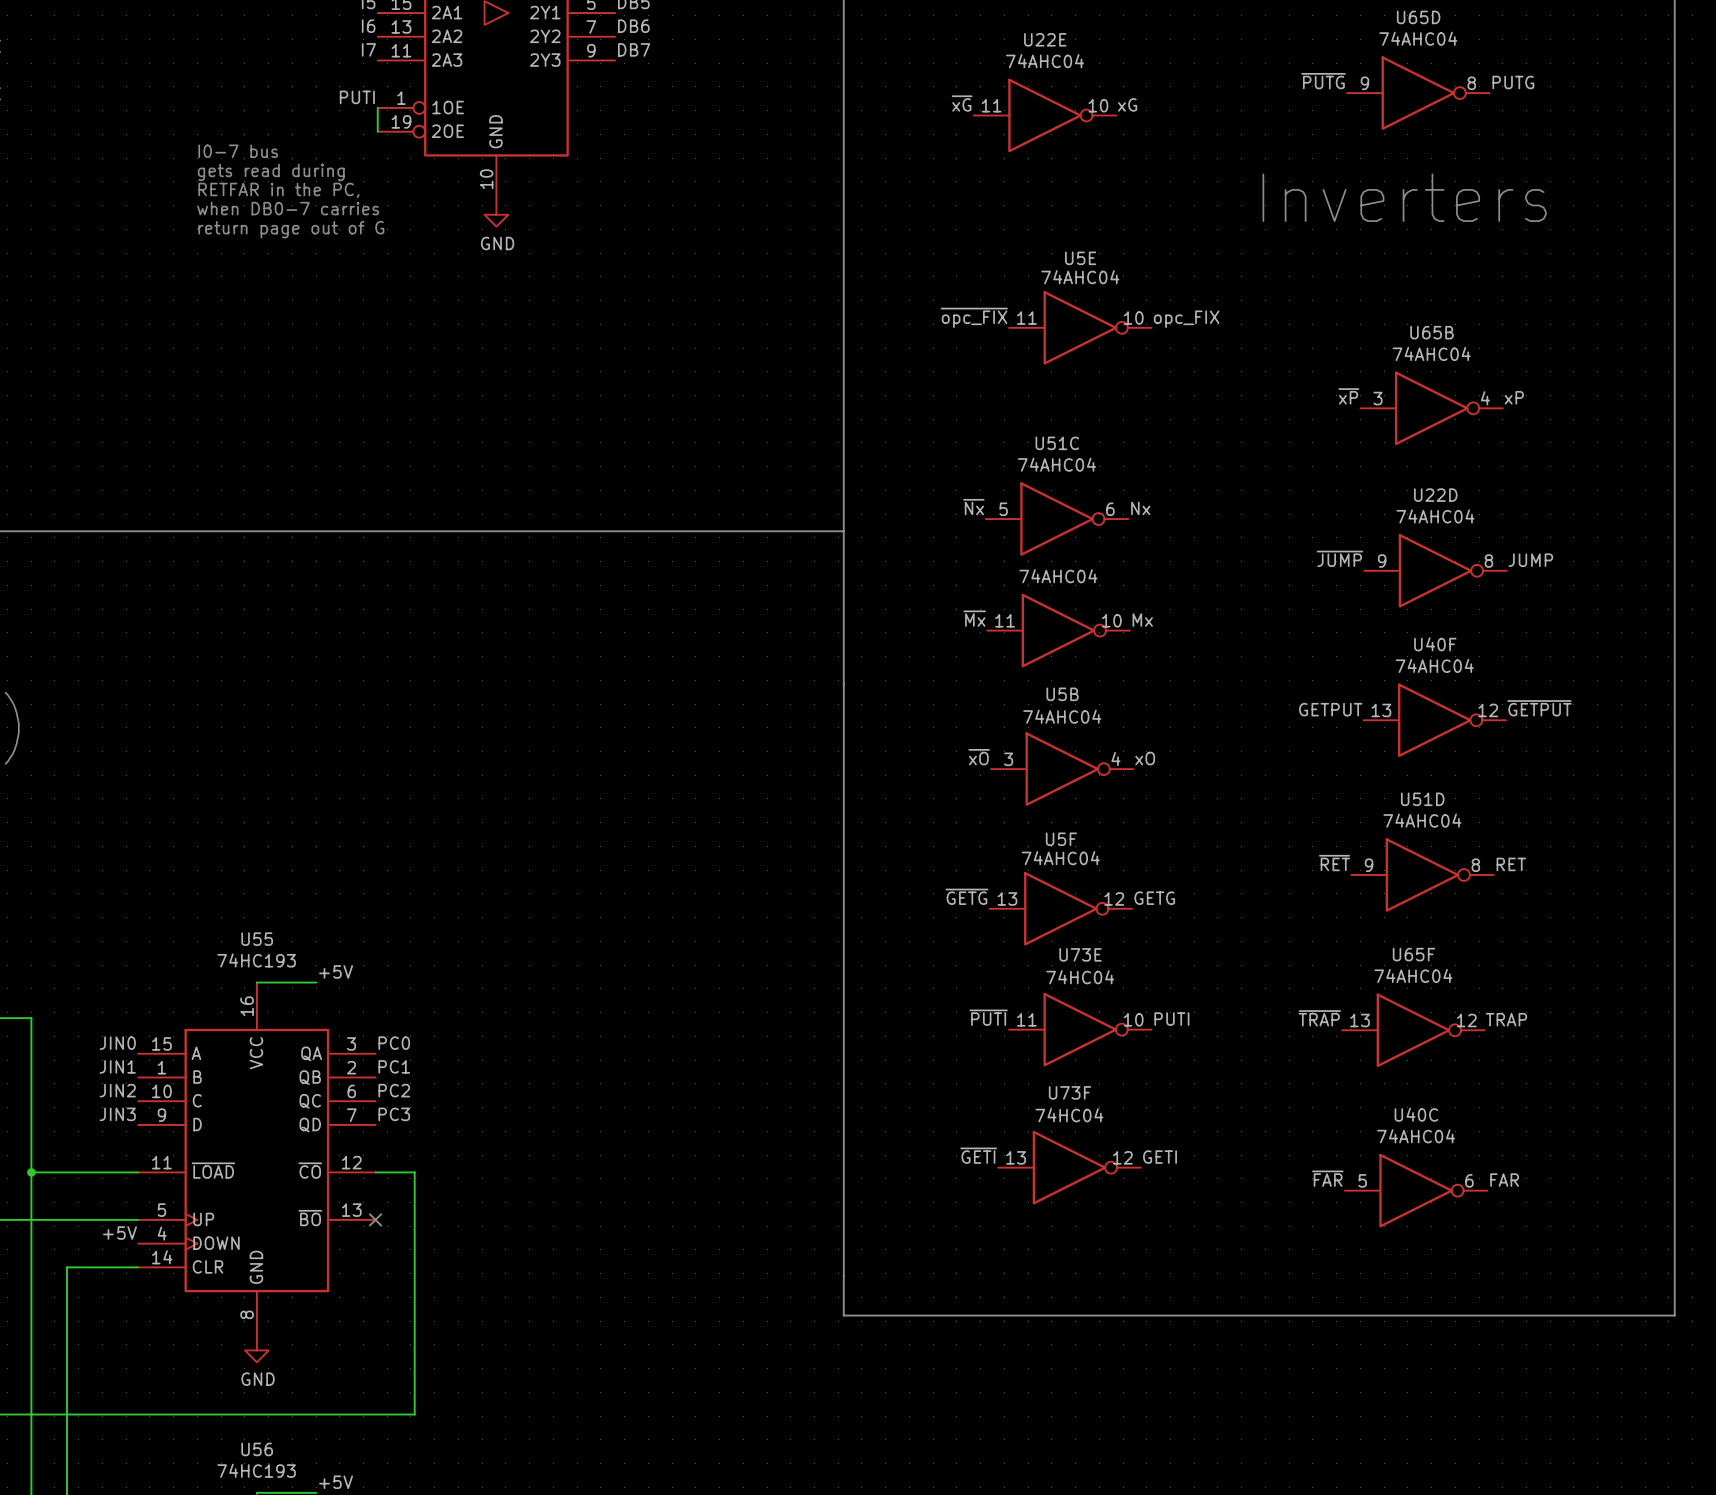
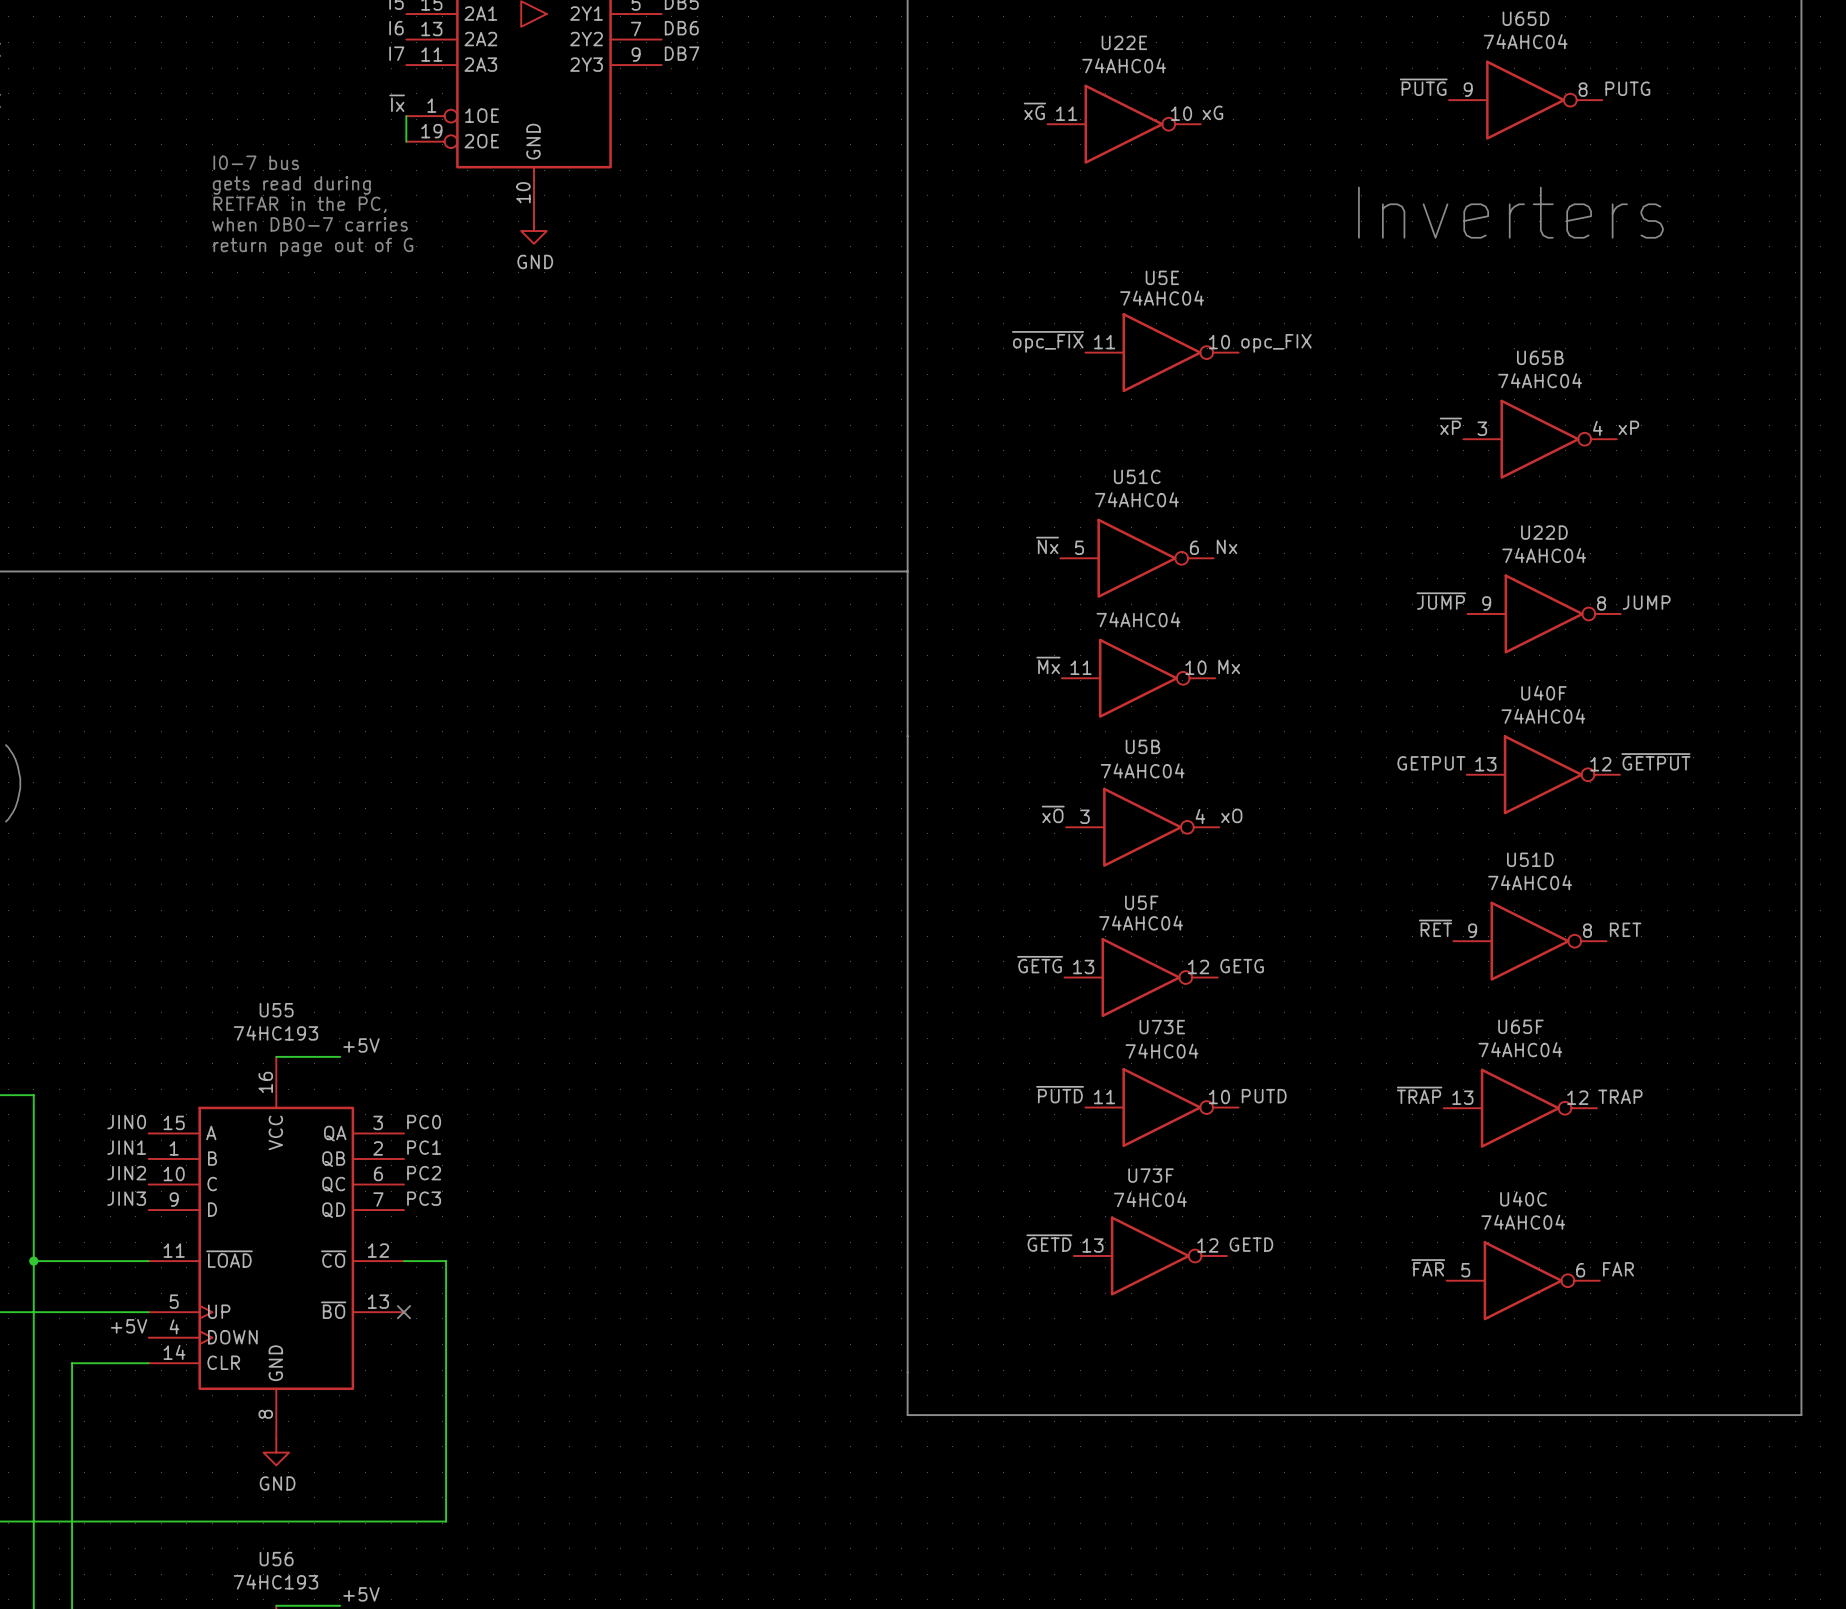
label: PUTI (357, 97) -> ~{Ix} (397, 103)
label: ~{PUTI} (988, 1017) -> ~{PUTD} (1060, 1094)
label: PUTI (1171, 1019) -> PUTD (1264, 1096)
label: ~{GETI} (978, 1155) -> ~{GETD} (1049, 1243)
label: GETI (1159, 1157) -> GETD (1251, 1244)

